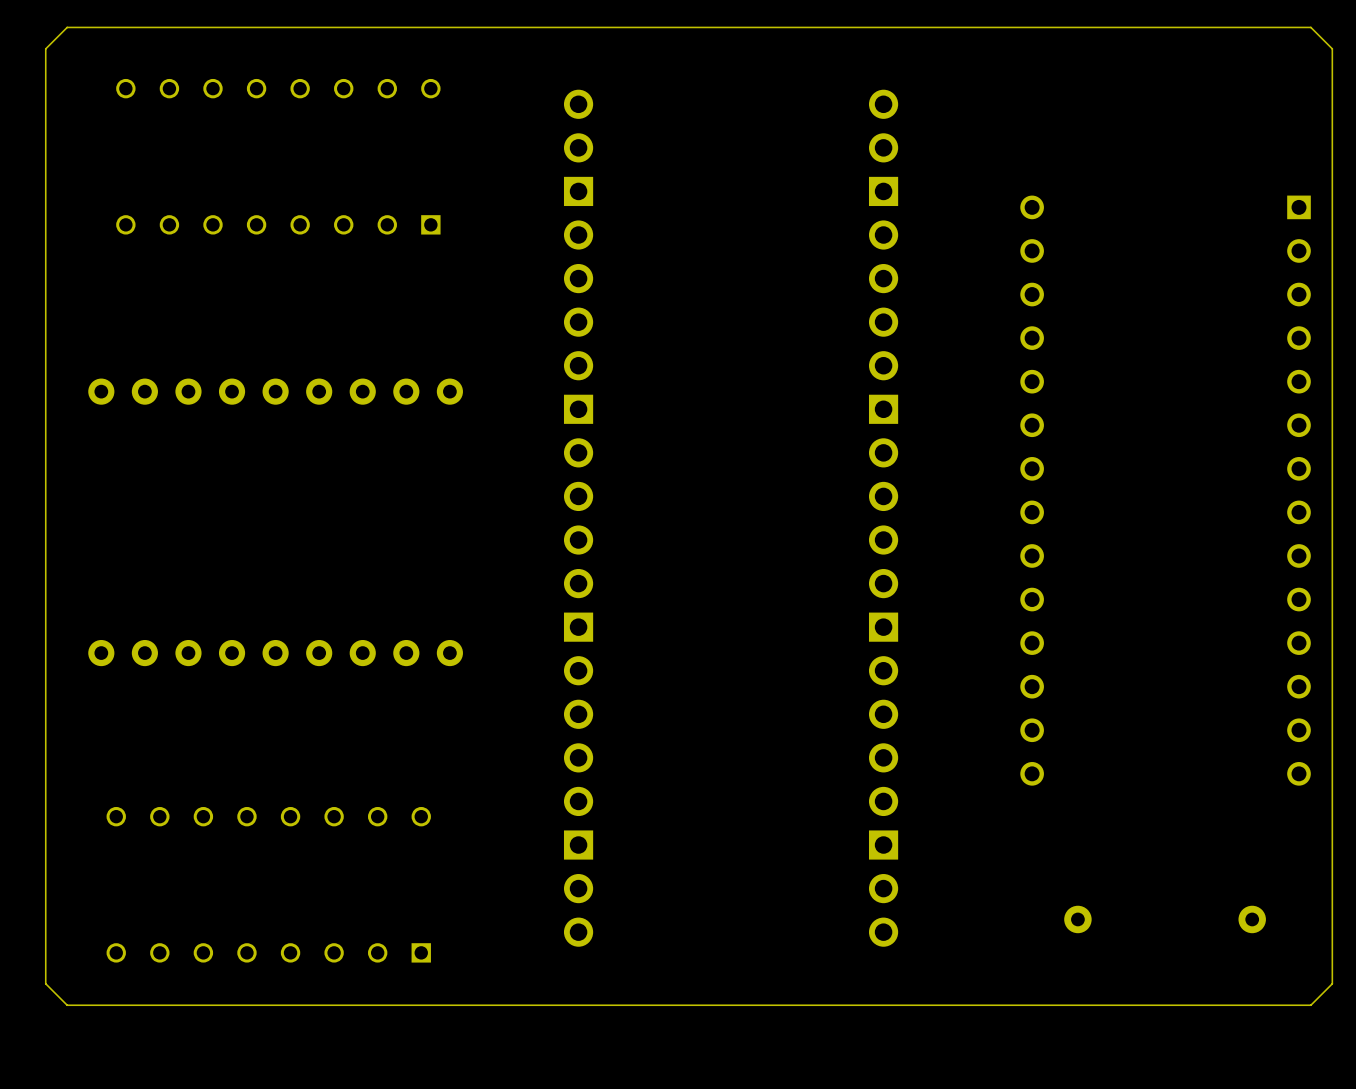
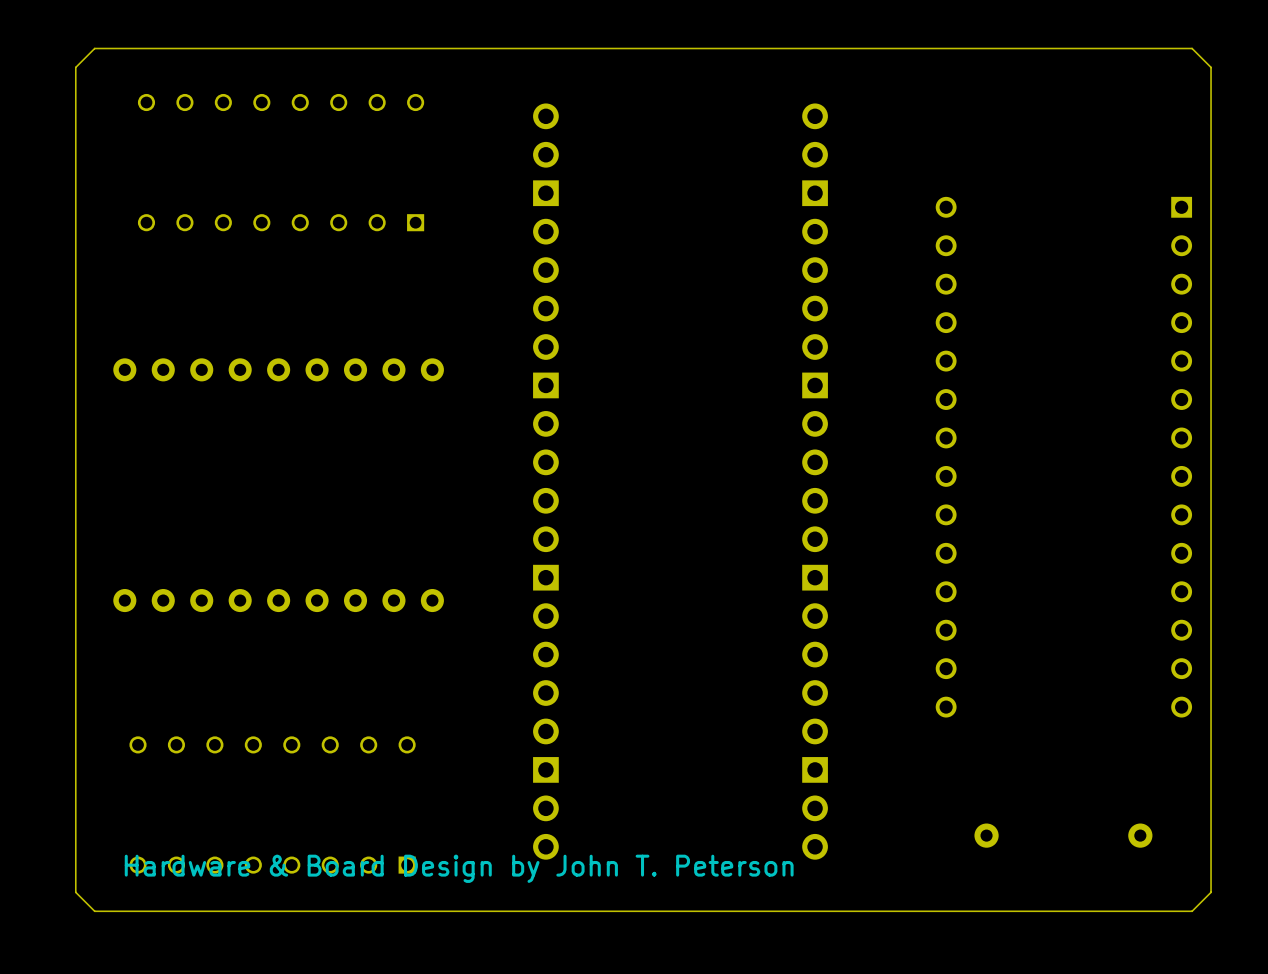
text: none -> Hardware & Board Design by John T. Peterson (459, 868)

